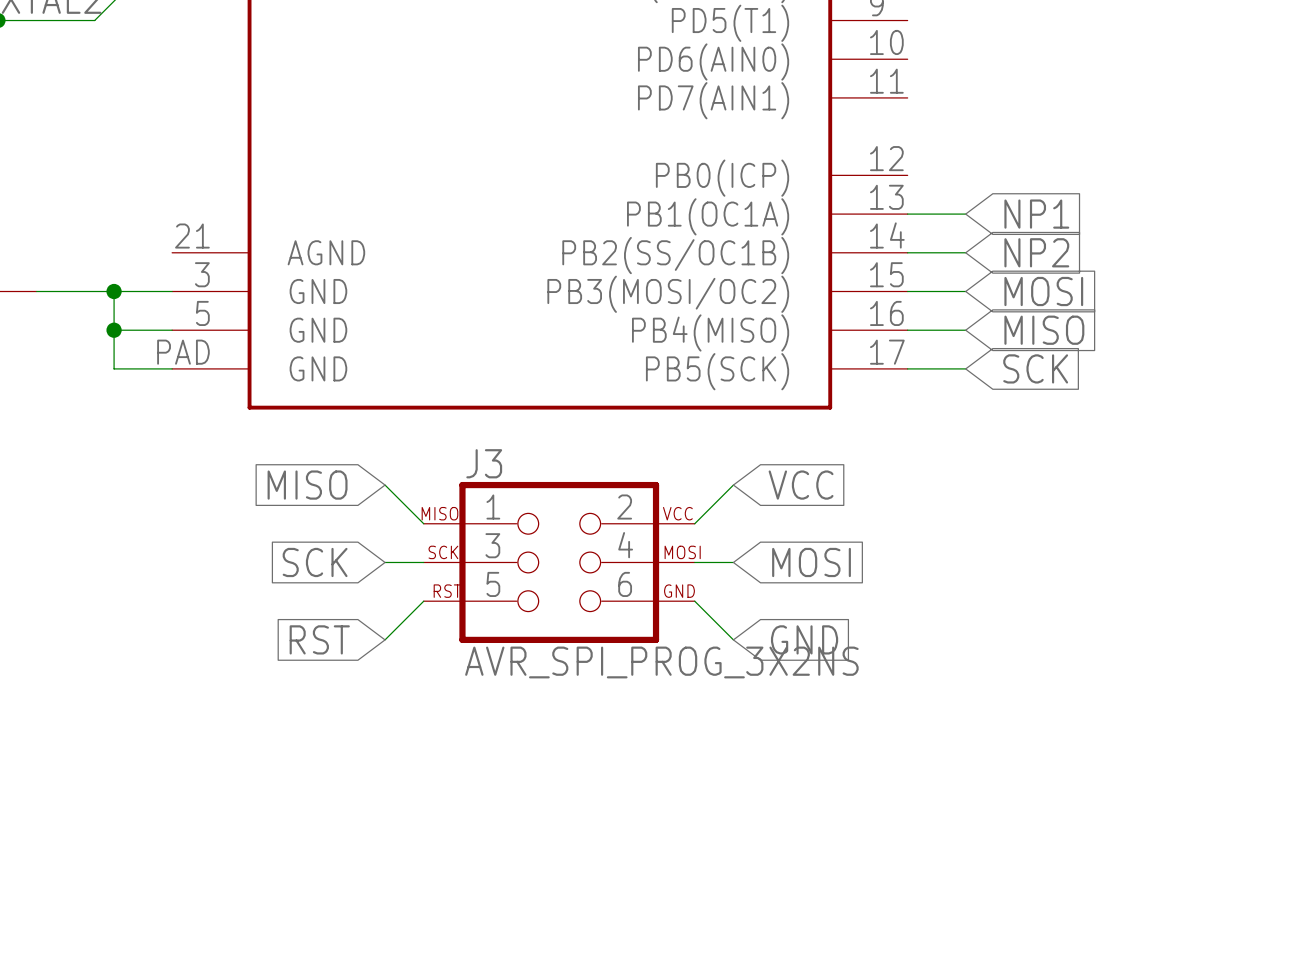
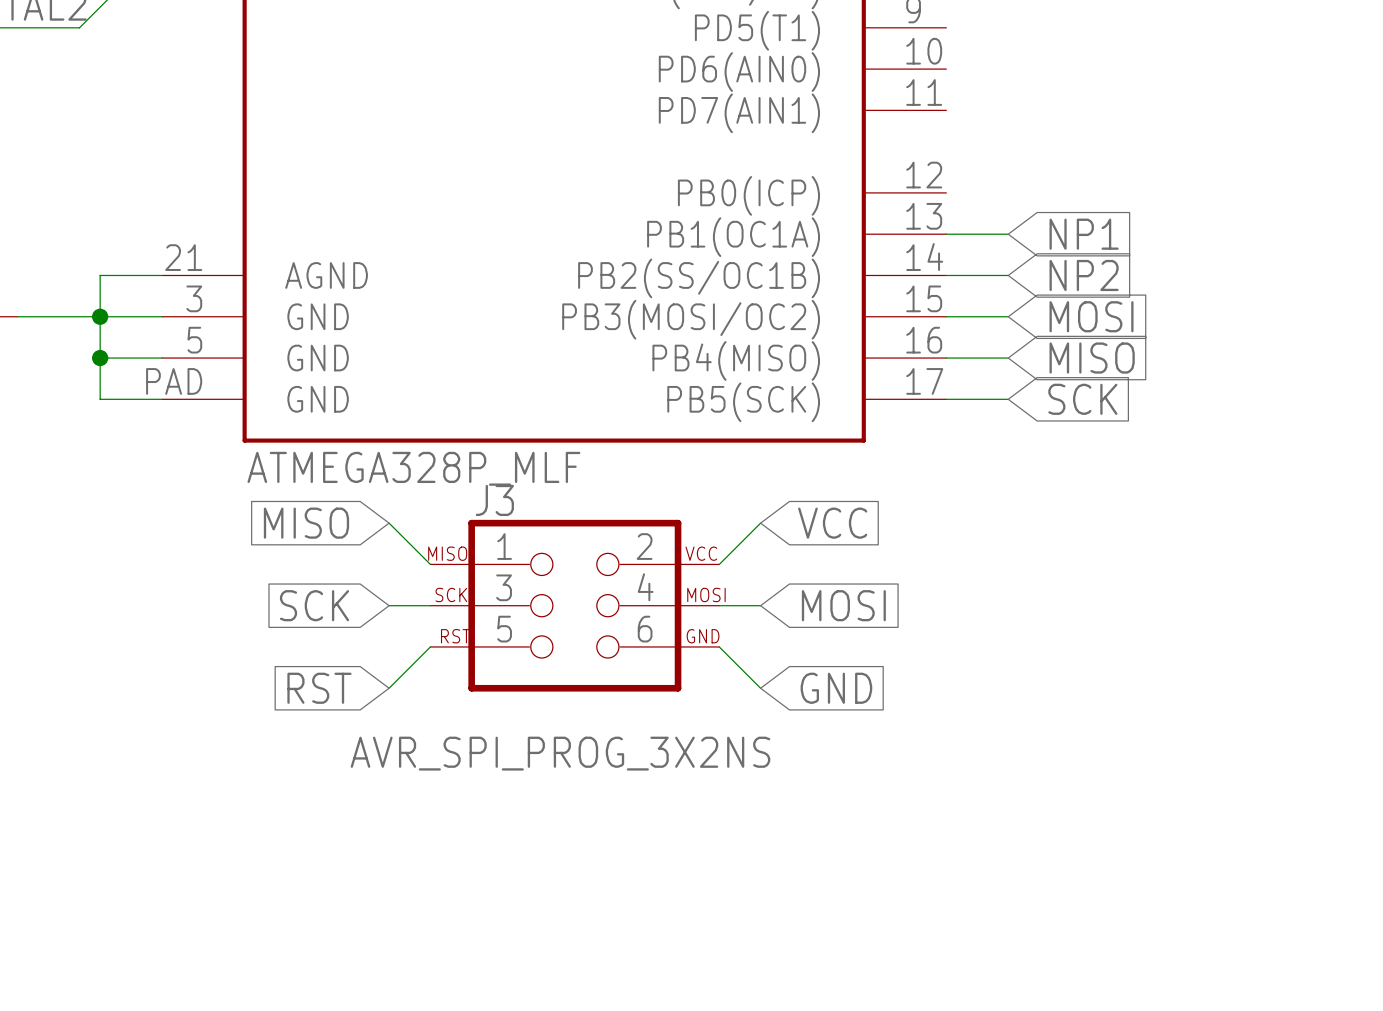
wire: none -> (162, 275) (100, 275) (100, 316)
part value: none -> ATMEGA328P_MLF (413, 468)
J3 value position: AVR_SPI_PROG_3X2NS (661, 662) -> AVR_SPI_PROG_3X2NS (560, 753)

